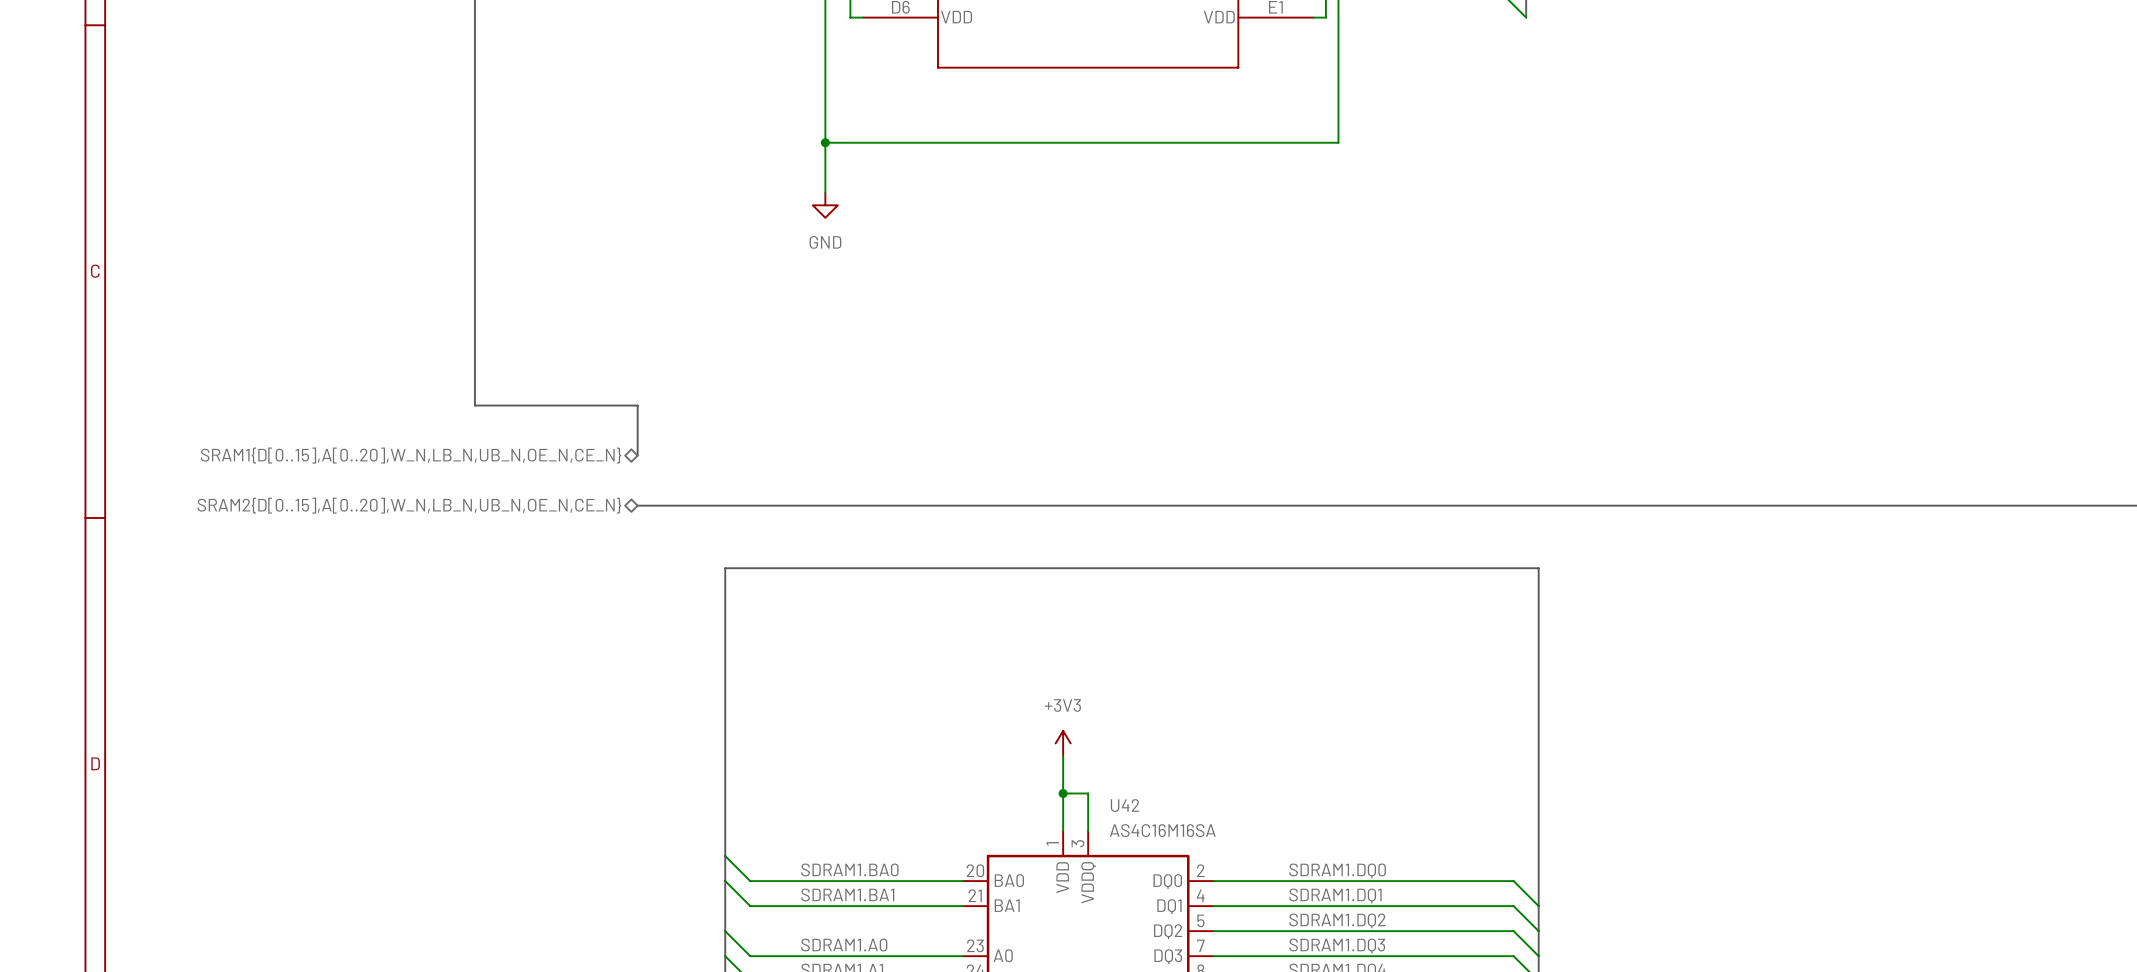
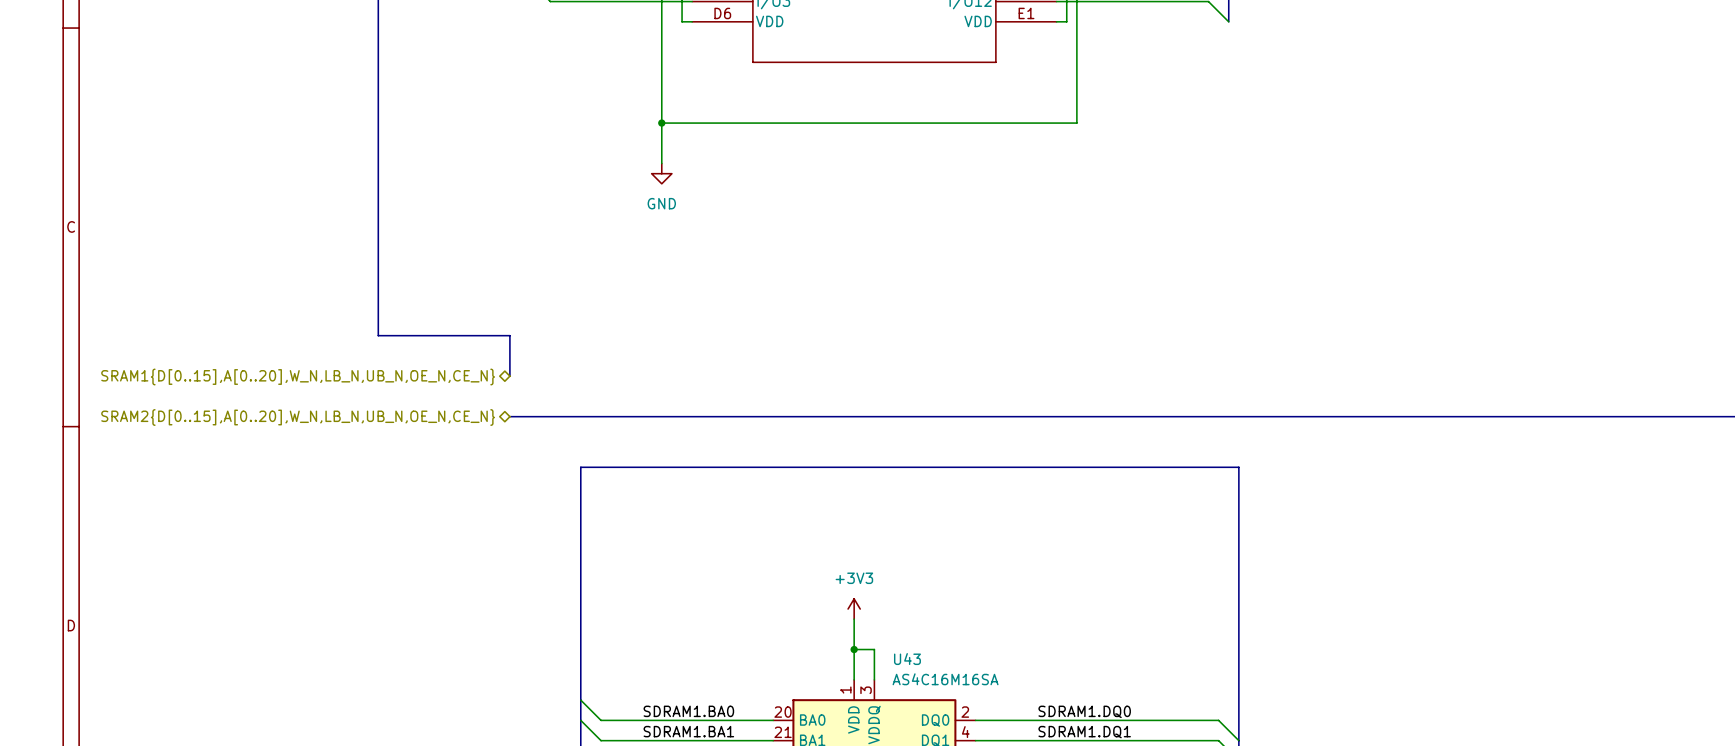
U42 name: U42 (1125, 805) -> U43 (907, 659)

